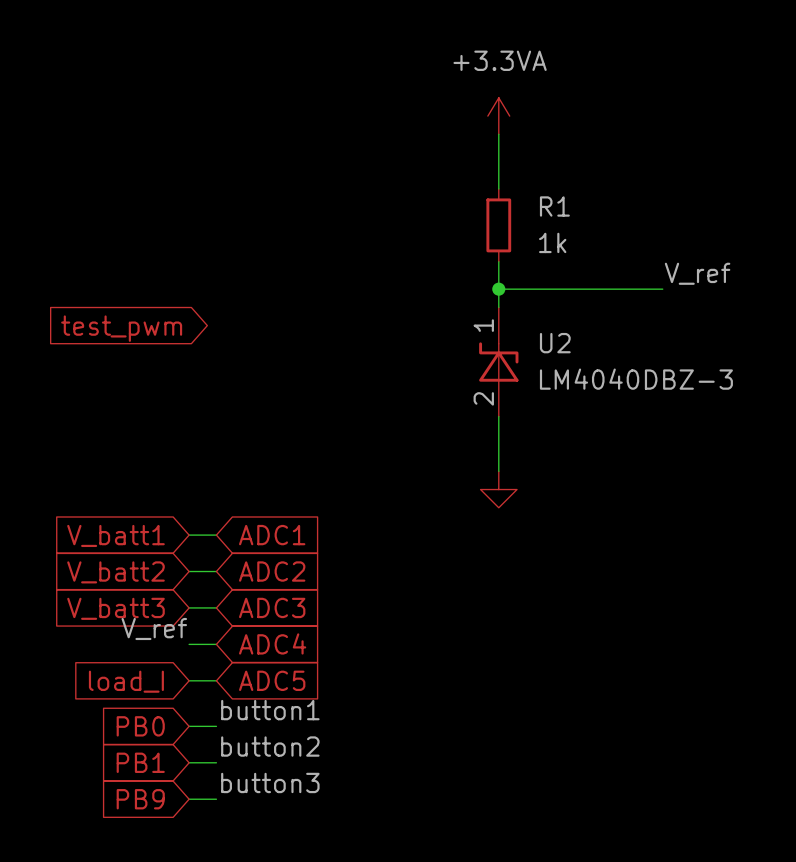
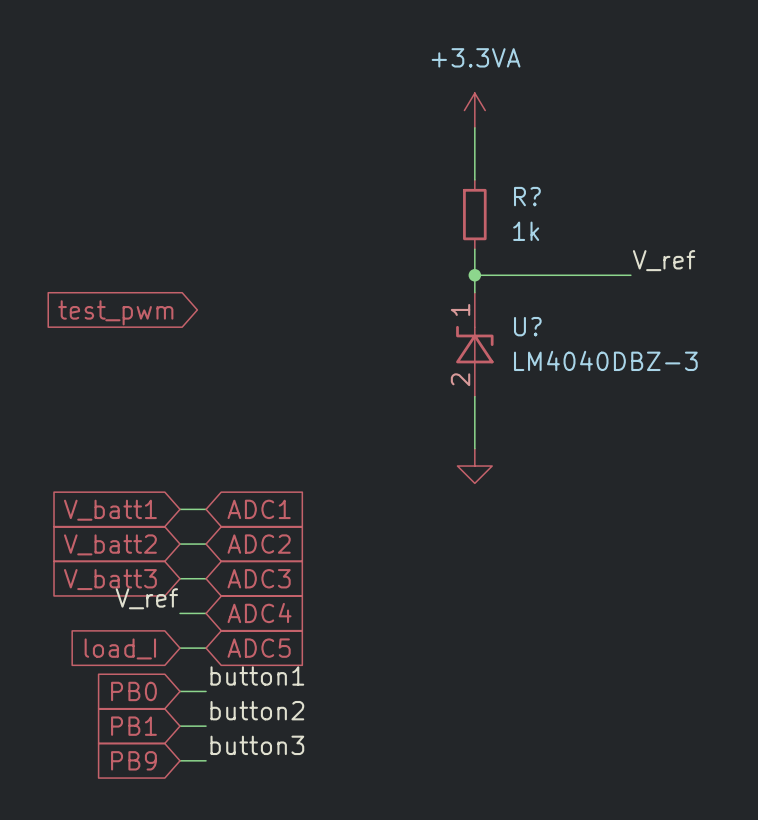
R1 name: R1 (554, 206) -> R? (527, 196)
U2 name: U2 (555, 343) -> U? (527, 326)

